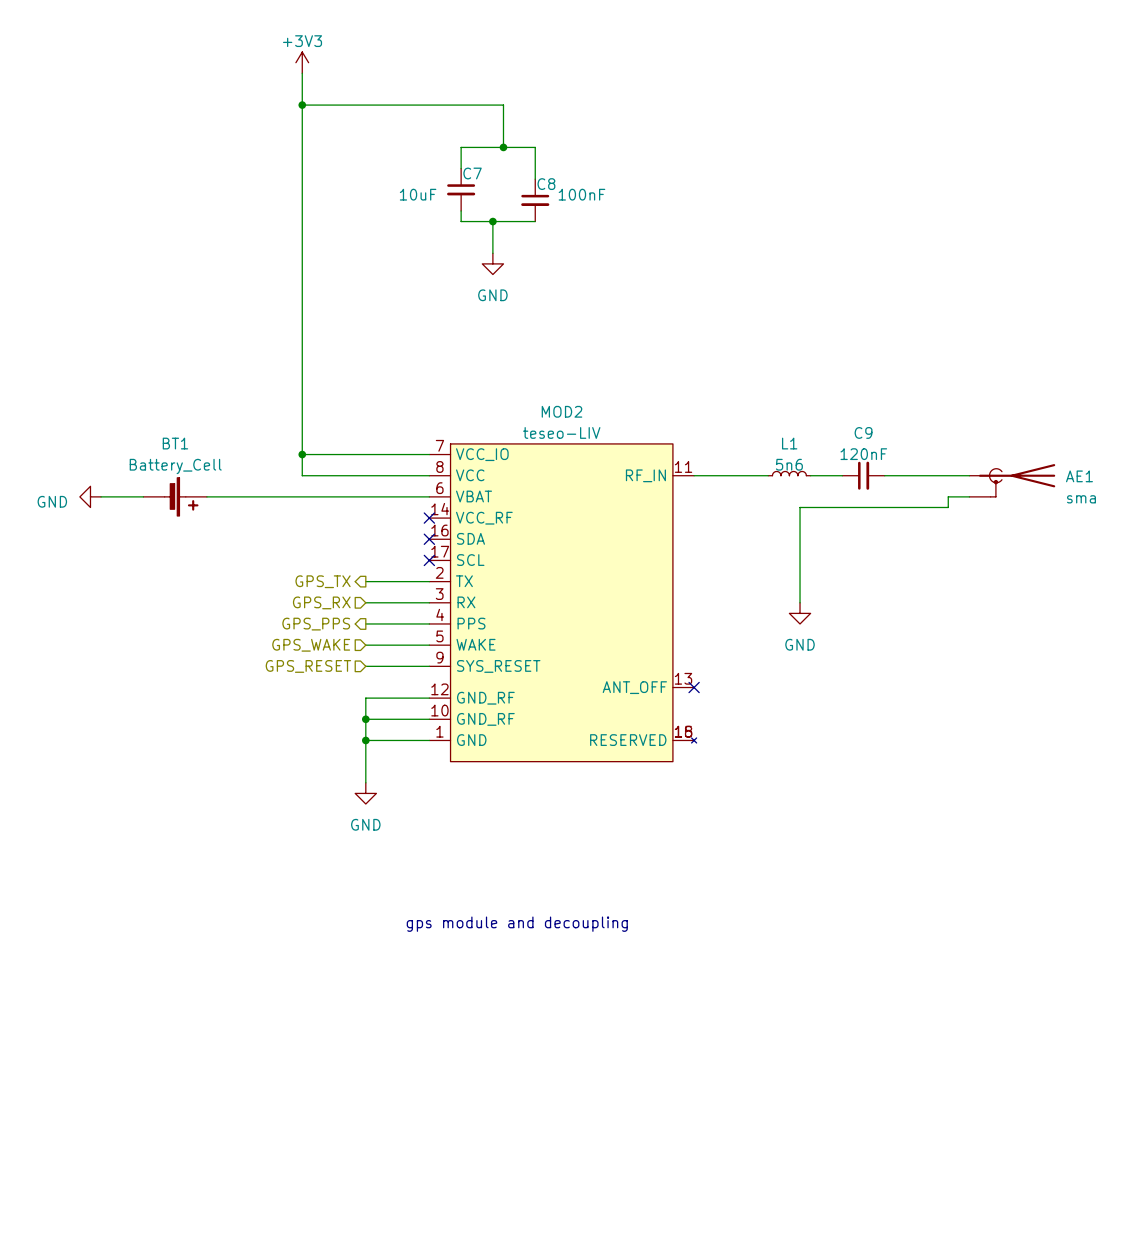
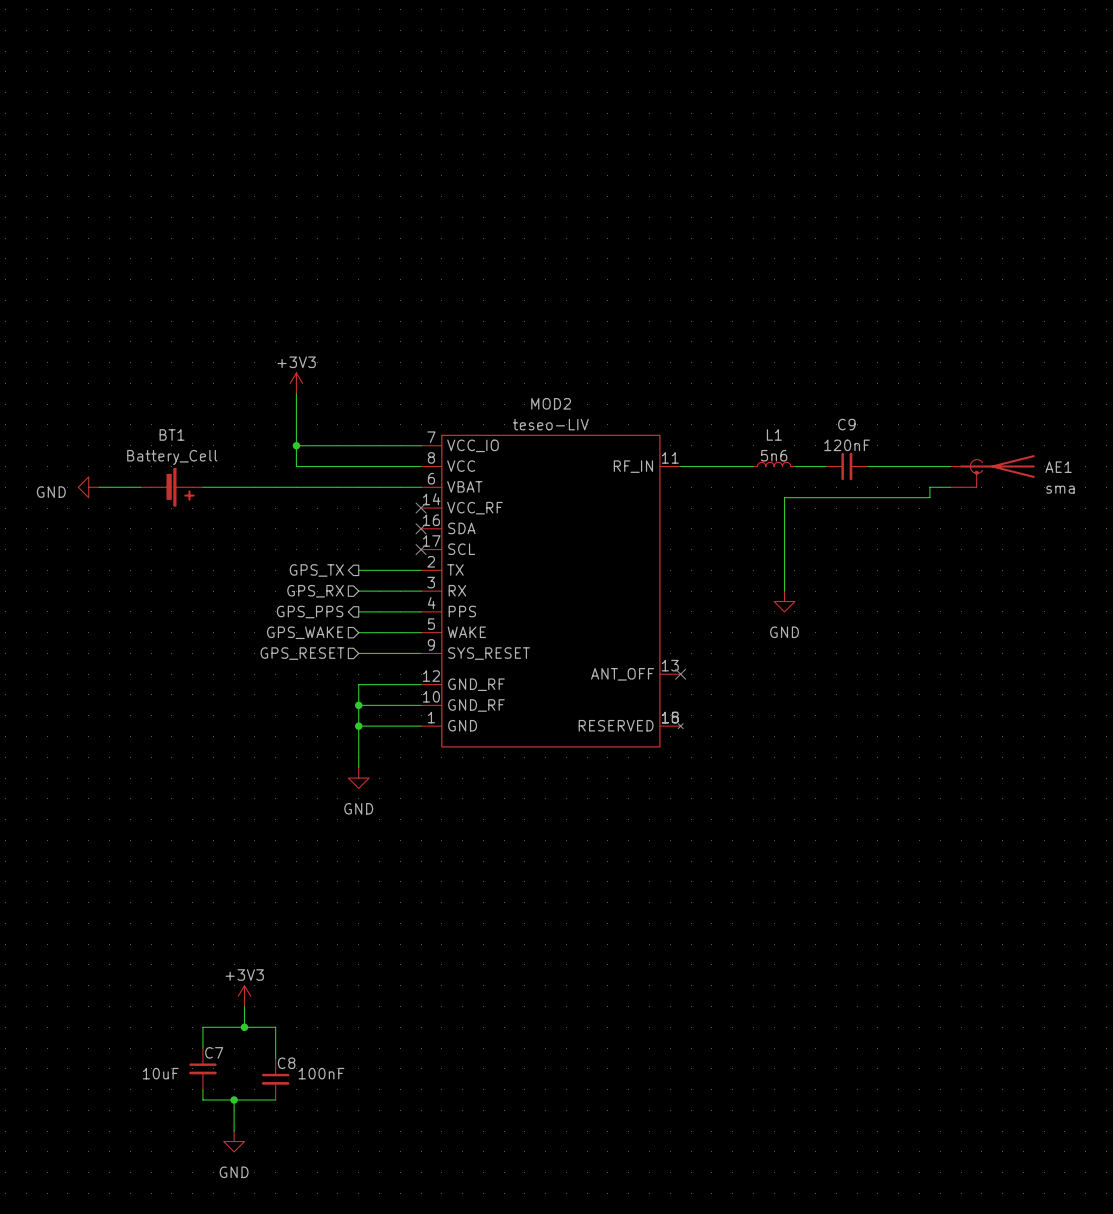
power symbol: +3V3 (302, 62) -> none
wire: (302, 73) (302, 401) -> none
wire: (302, 105) (503, 105) (503, 147) -> none
junction: (302, 105) -> none
junction: (503, 147) -> none
wire: (461, 168) (461, 147) (535, 147) (535, 179) -> none
C7 position: (461, 189) -> (202, 1068)
C8 position: (535, 200) -> (275, 1079)
wire: (461, 210) (461, 221) (535, 221) -> none
wire: (492, 221) (492, 253) -> none
junction: (492, 221) -> none
power symbol: GND (492, 263) -> none
power symbol: none -> +3V3 (296, 383)
text: gps module and decoupling (517, 924) -> none
power symbol: none -> +3V3 (244, 996)
wire: none -> (244, 1006) (244, 1027)
junction: none -> (244, 1027)
wire: none -> (202, 1048) (202, 1027) (275, 1027) (275, 1058)
wire: none -> (202, 1089) (202, 1099) (275, 1099)
wire: none -> (234, 1099) (234, 1131)
junction: none -> (234, 1099)
power symbol: none -> GND (234, 1141)

